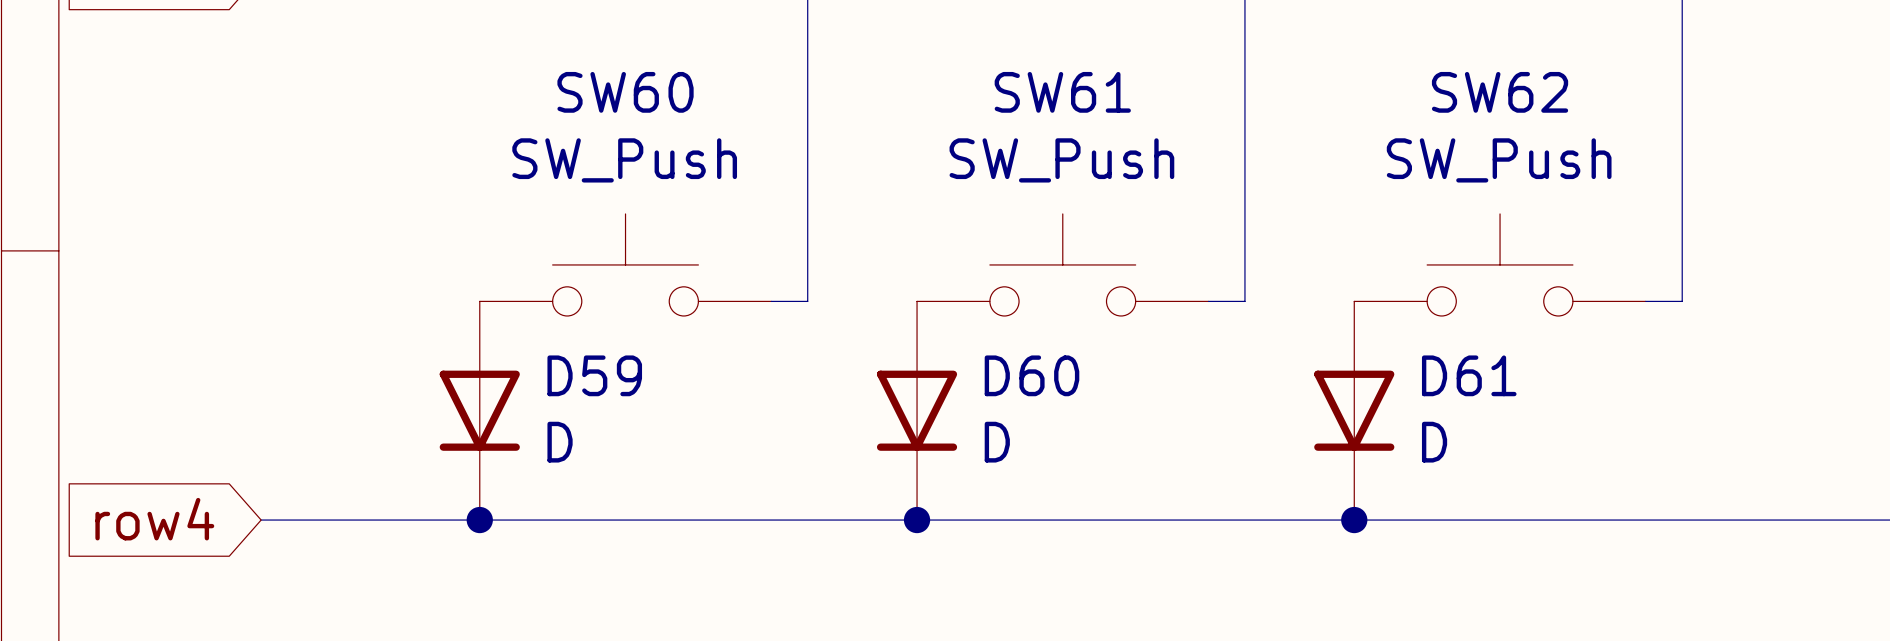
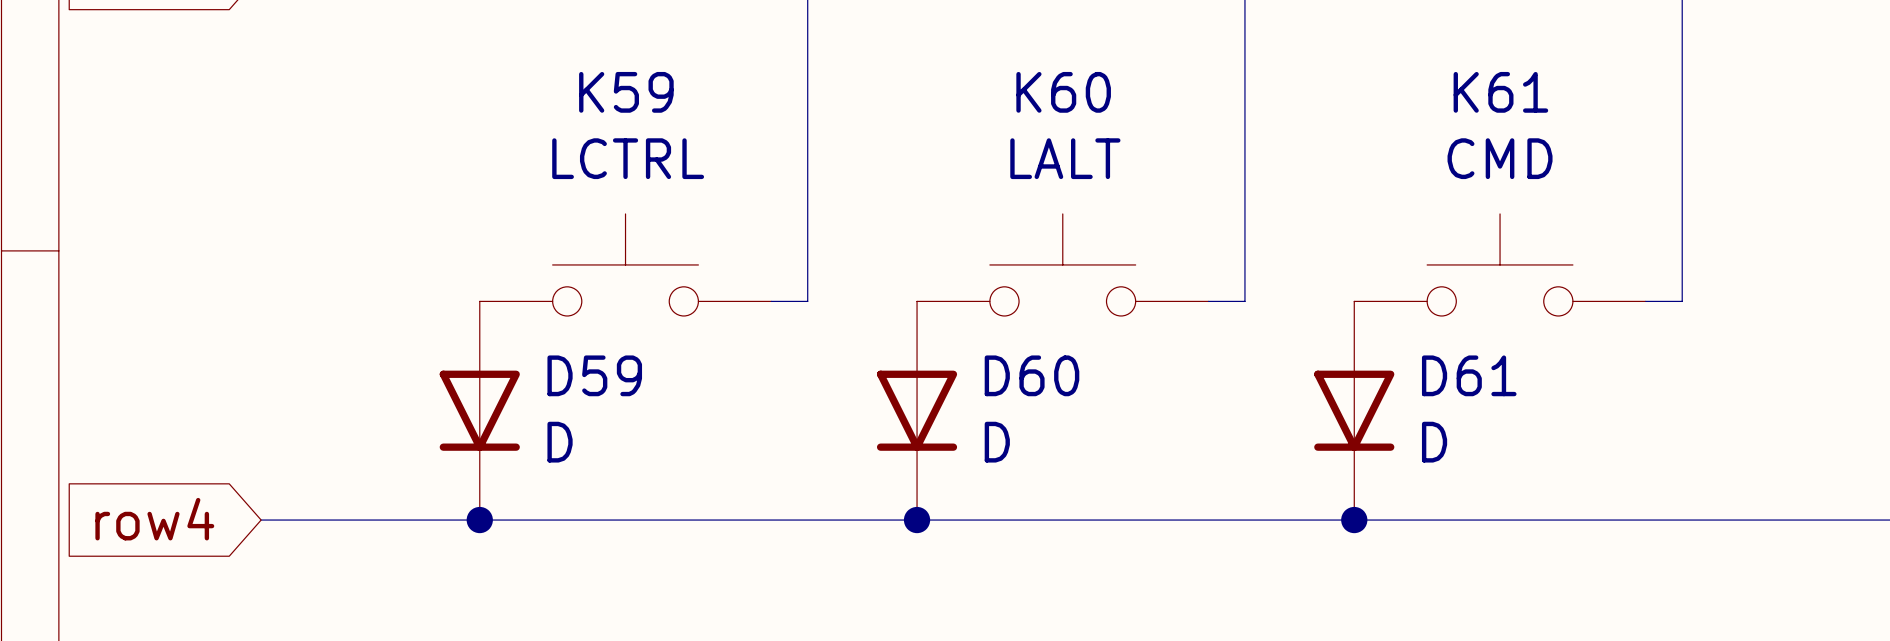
SW60 name: SW60 (625, 92) -> K59 (626, 92)
SW61 name: SW61 (1062, 92) -> K60 (1063, 92)
SW62 name: SW62 (1500, 92) -> K61 (1500, 92)
SW60 value: SW_Push (624, 160) -> LCTRL (628, 158)
SW61 value: SW_Push (1061, 160) -> LALT (1065, 158)
SW62 value: SW_Push (1499, 160) -> CMD (1500, 158)

